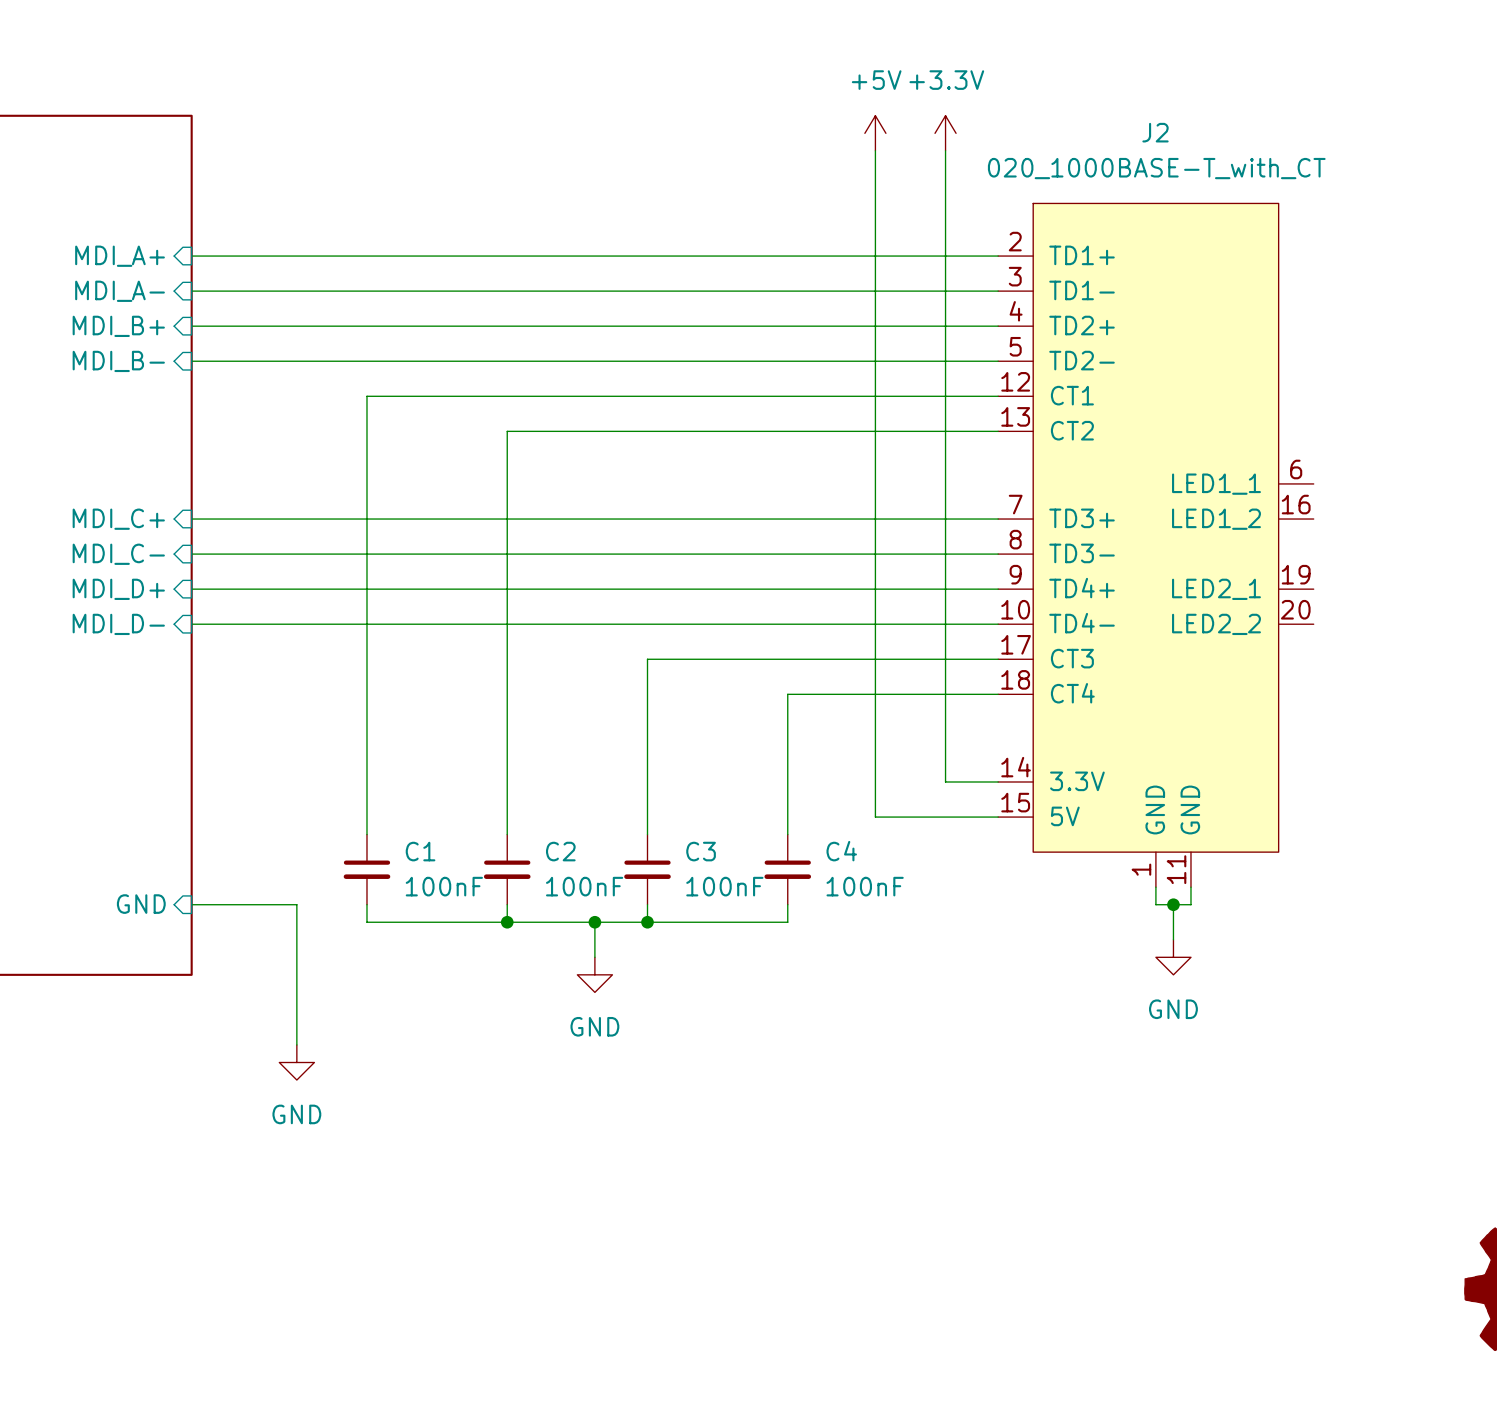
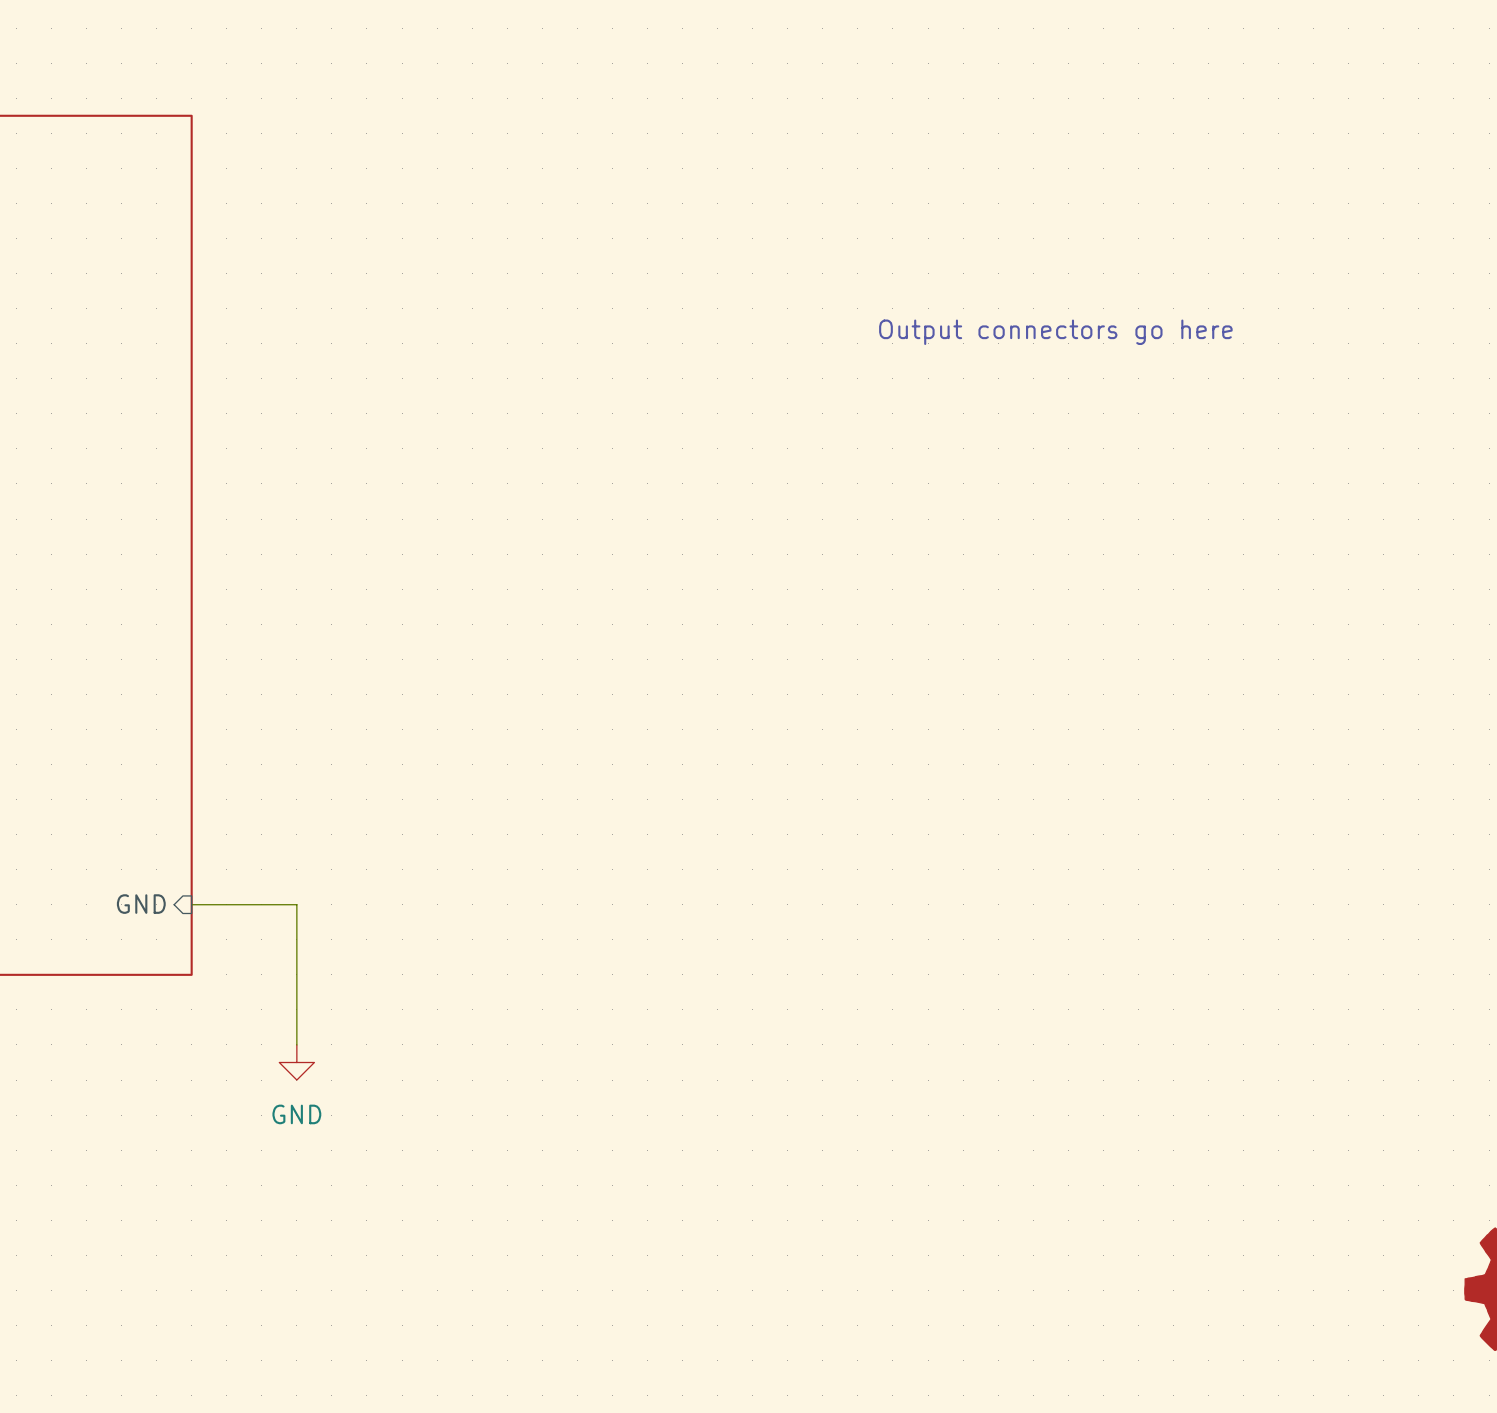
power symbol: +5V (875, 133) -> none
power symbol: +3.3V (945, 133) -> none
wire: (875, 150) (875, 817) (998, 817) -> none
wire: (945, 150) (945, 781) (998, 781) -> none
sheet pin: MDI_A+ (120, 256) -> none
wire: (191, 256) (998, 256) -> none
sheet pin: MDI_A- (120, 291) -> none
wire: (191, 291) (998, 291) -> none
sheet pin: MDI_B+ (118, 326) -> none
wire: (191, 326) (998, 326) -> none
text: none -> Output connectors go here (1055, 332)
sheet pin: MDI_B- (118, 361) -> none
wire: (191, 361) (998, 361) -> none
wire: (998, 396) (366, 396) (366, 834) -> none
wire: (998, 431) (507, 431) (507, 834) -> none
sheet pin: MDI_C+ (118, 519) -> none
wire: (191, 519) (998, 519) -> none
J2: 020_1000BASE-T_with_CT (1155, 545) -> none
sheet pin: MDI_C- (118, 554) -> none
wire: (191, 554) (998, 554) -> none
sheet pin: MDI_D+ (118, 589) -> none
wire: (191, 589) (998, 589) -> none
sheet pin: MDI_D- (118, 624) -> none
wire: (191, 624) (998, 624) -> none
wire: (998, 659) (647, 659) (647, 834) -> none
wire: (998, 694) (787, 694) (787, 834) -> none
C1: 100nF (366, 869) -> none
C2: 100nF (507, 869) -> none
C3: 100nF (647, 869) -> none
C4: 100nF (787, 869) -> none
wire: (1155, 887) (1155, 904) (1190, 904) (1190, 887) -> none
wire: (366, 904) (366, 922) (787, 922) (787, 904) -> none
wire: (507, 904) (507, 922) -> none
wire: (647, 904) (647, 922) -> none
wire: (1173, 904) (1173, 939) -> none
junction: (1173, 904) -> none
junction: (507, 922) -> none
wire: (594, 922) (594, 957) -> none
junction: (594, 922) -> none
junction: (647, 922) -> none
power symbol: GND (1173, 957) -> none
power symbol: GND (594, 974) -> none

